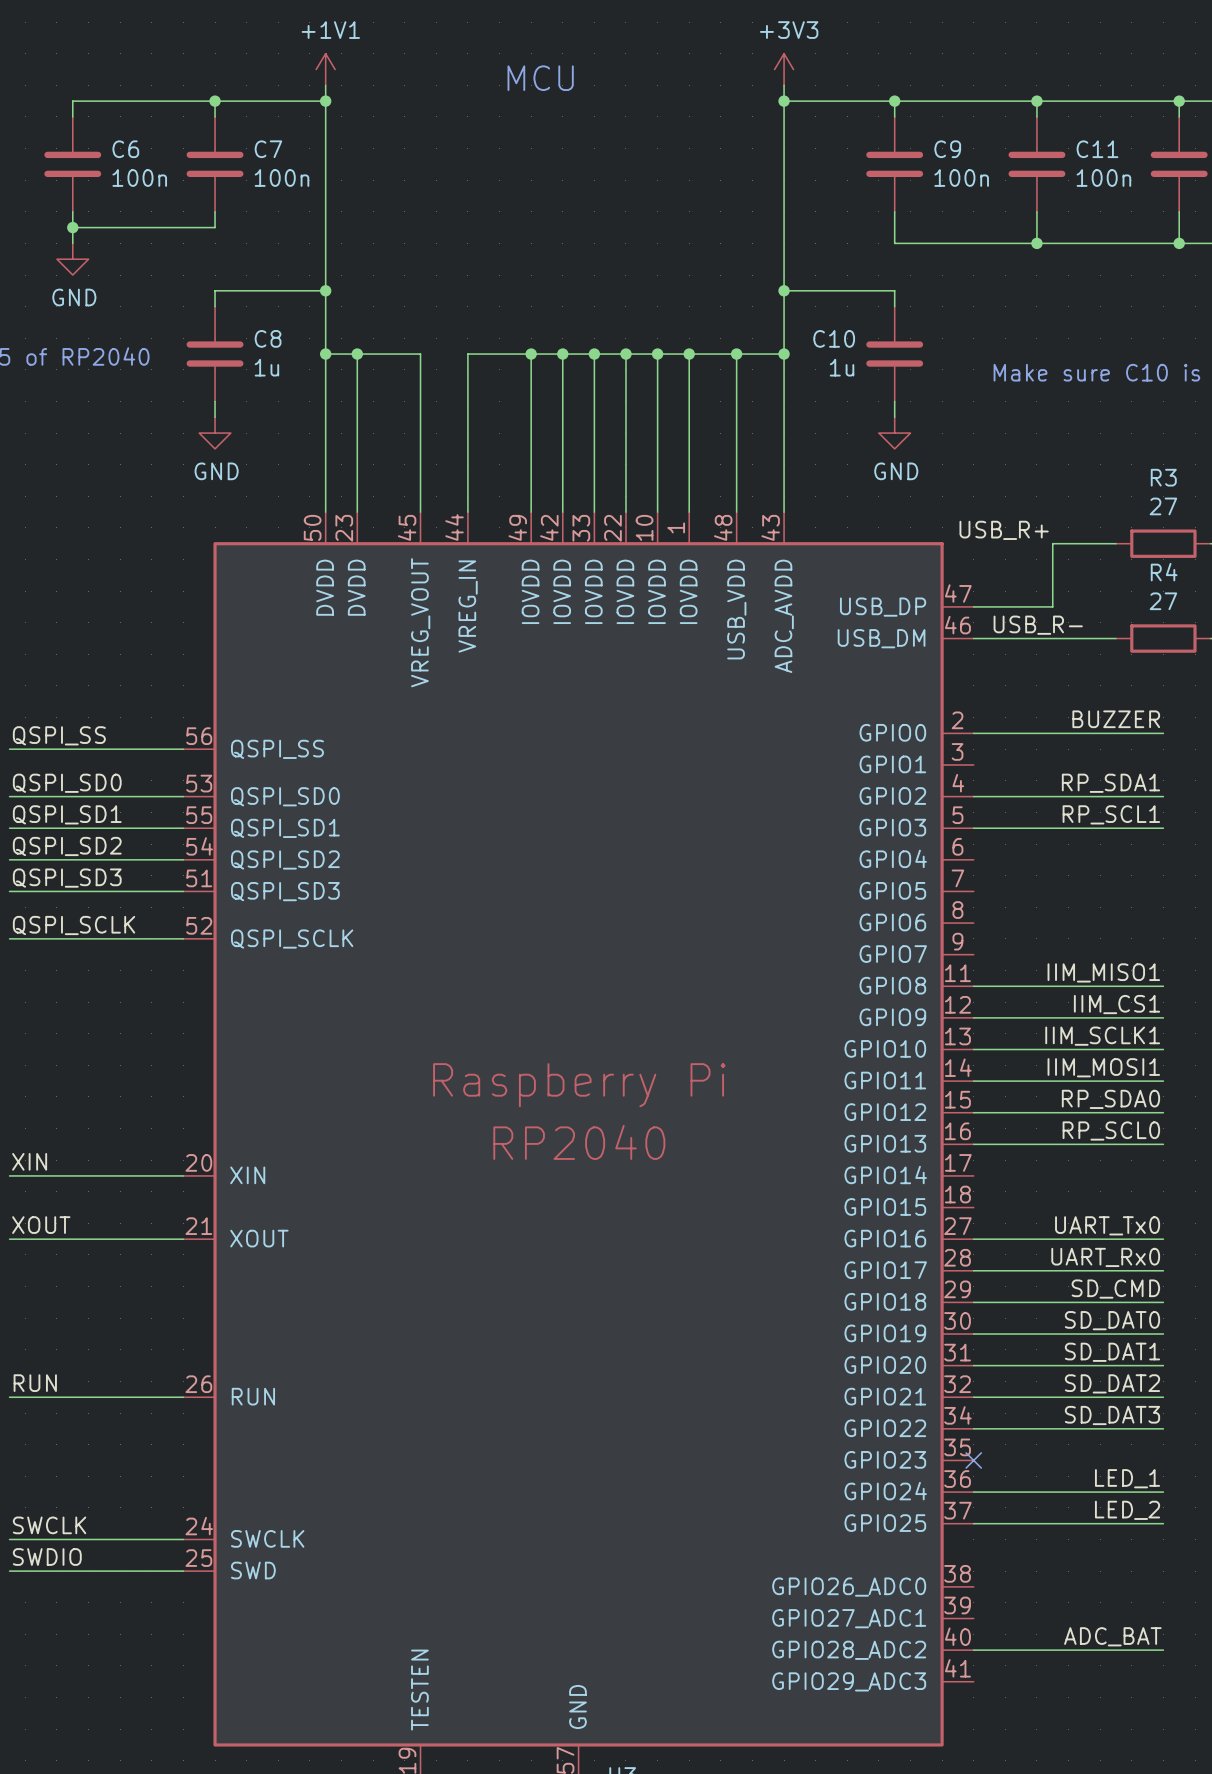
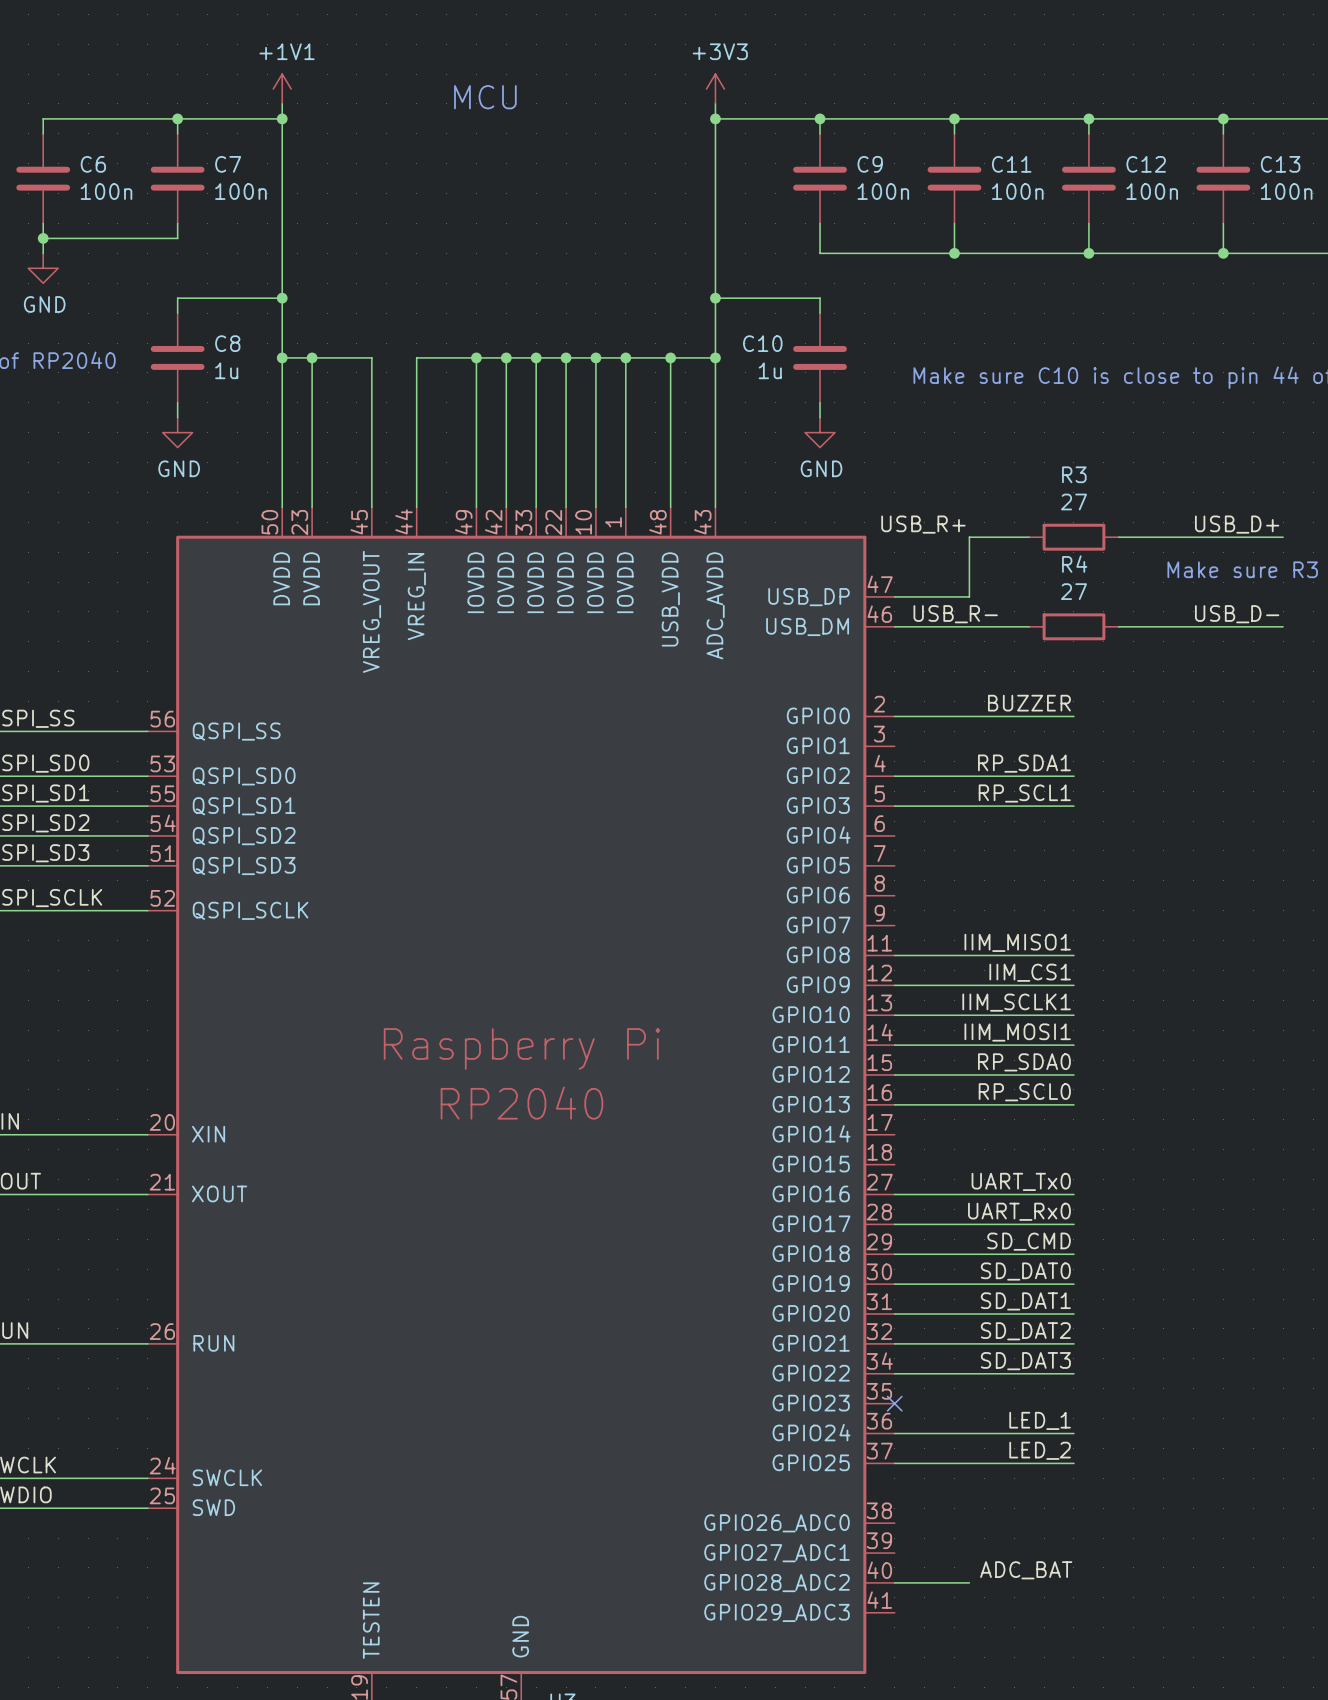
wire: (1052, 1650) (1163, 1650) -> none

